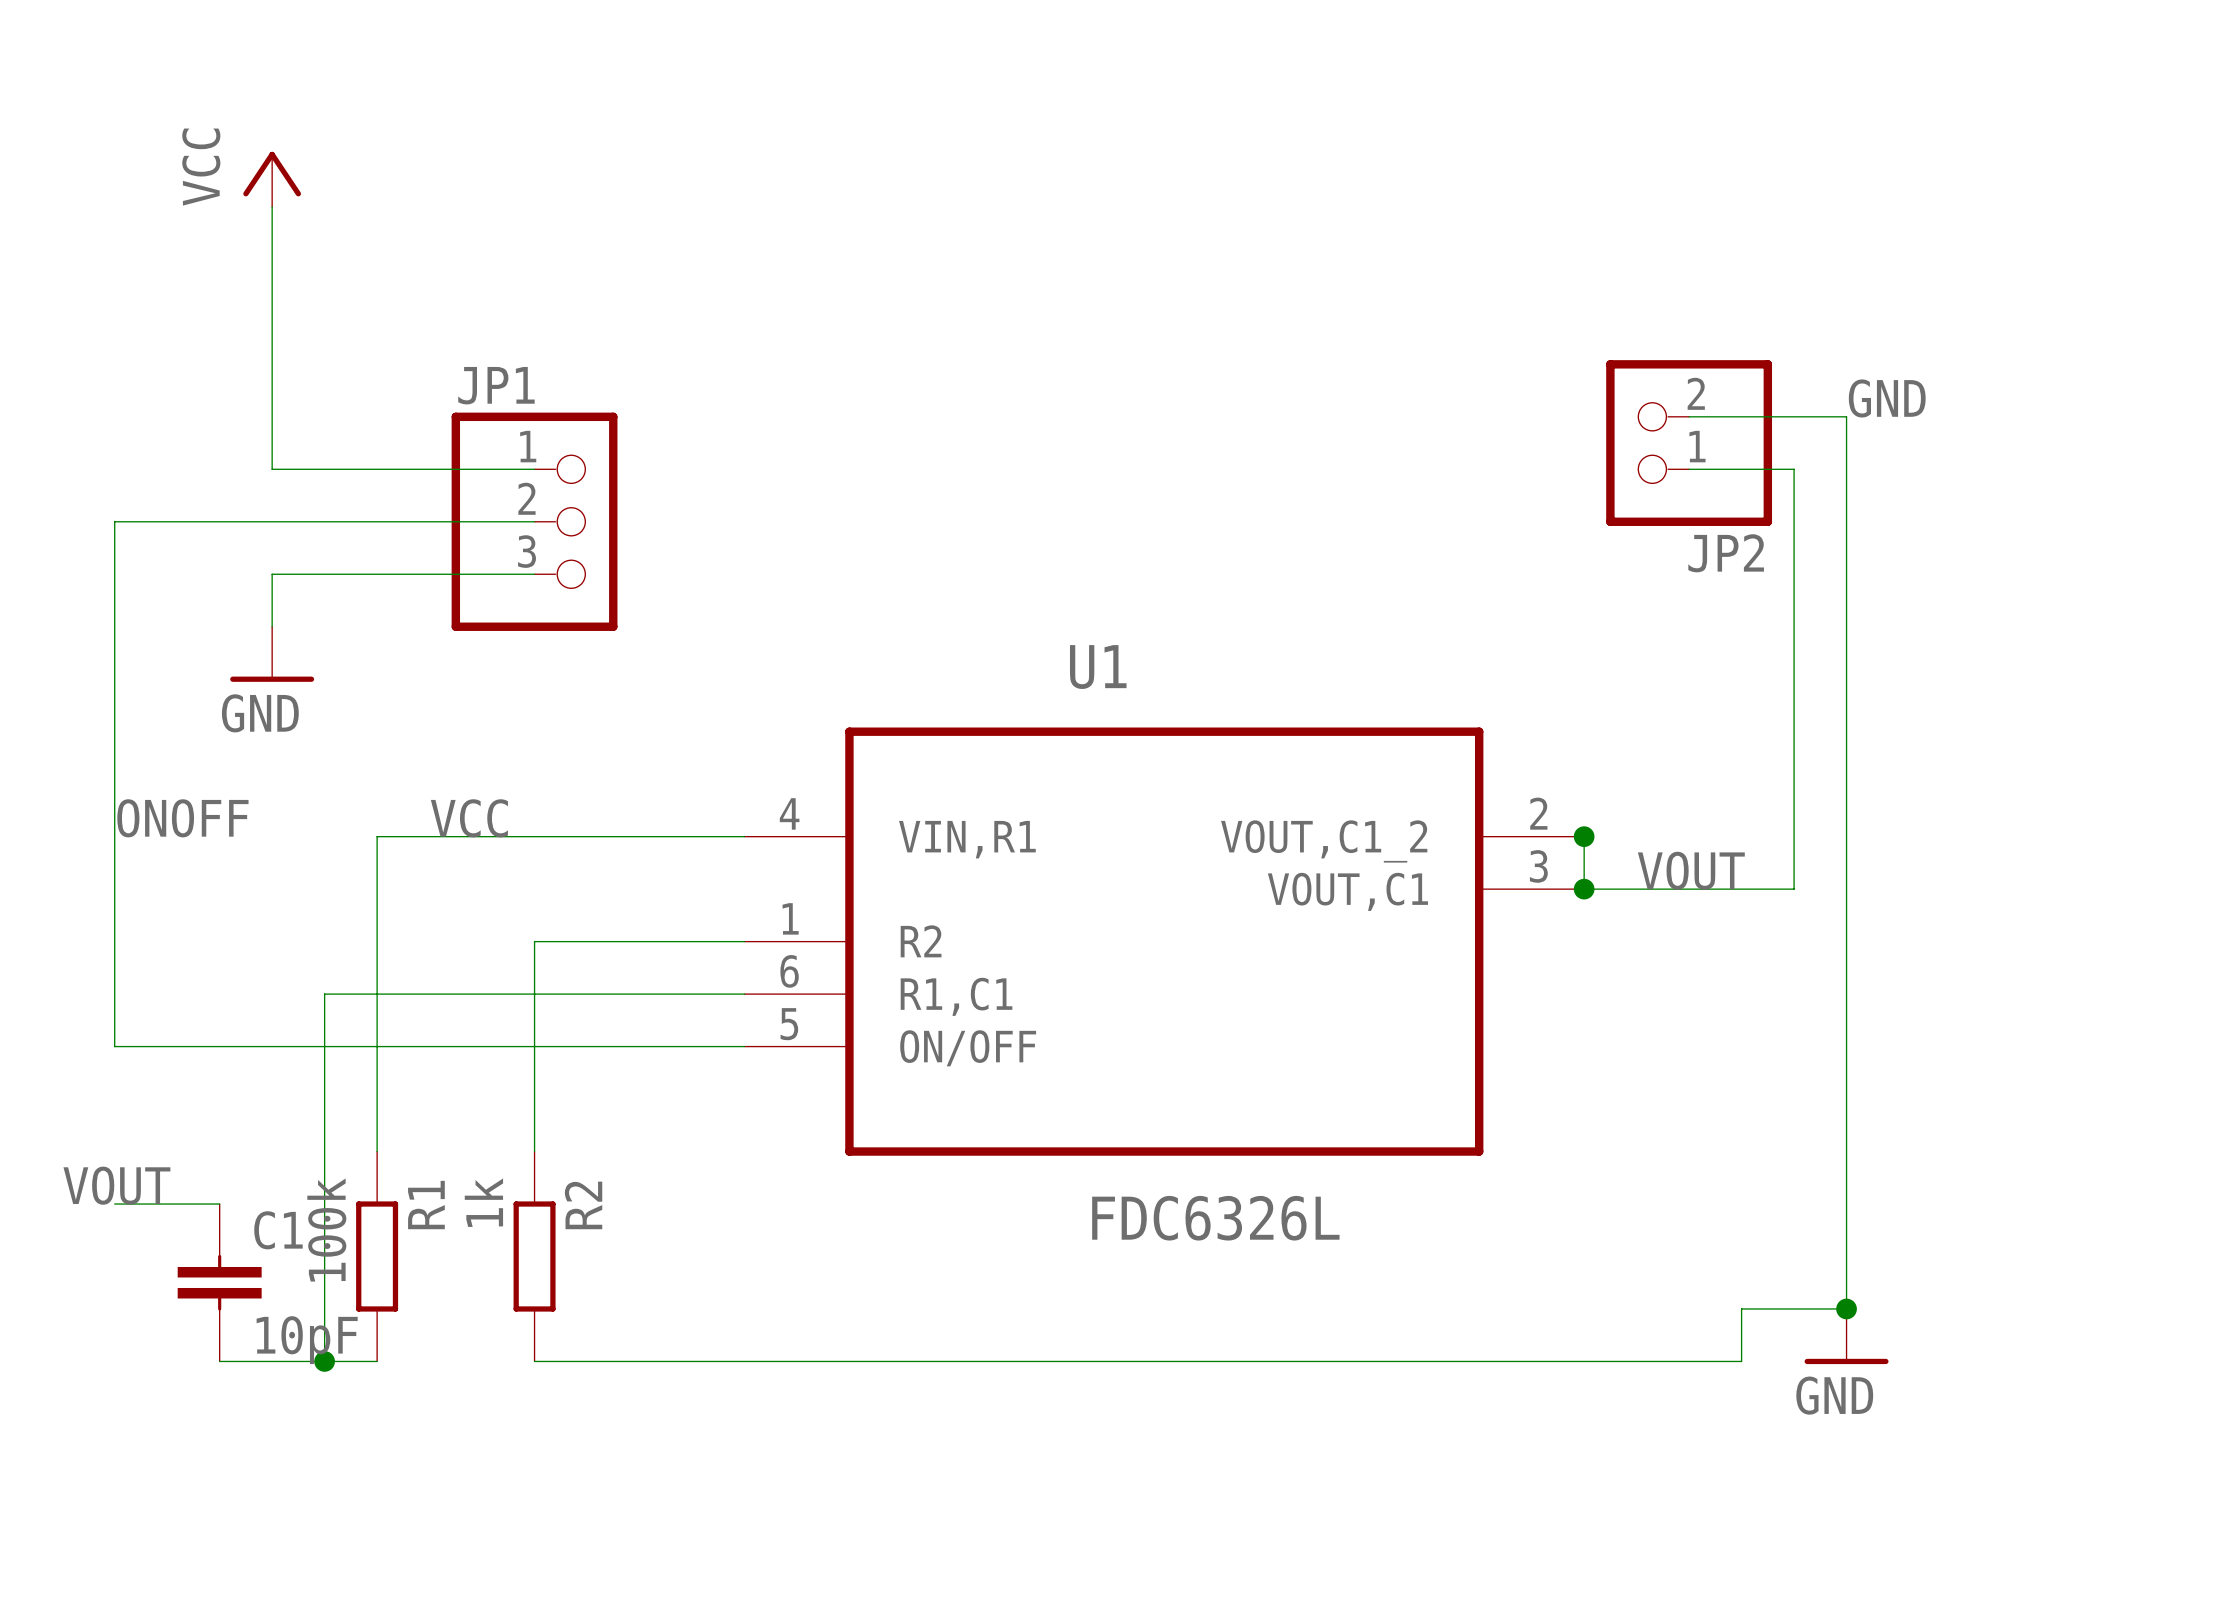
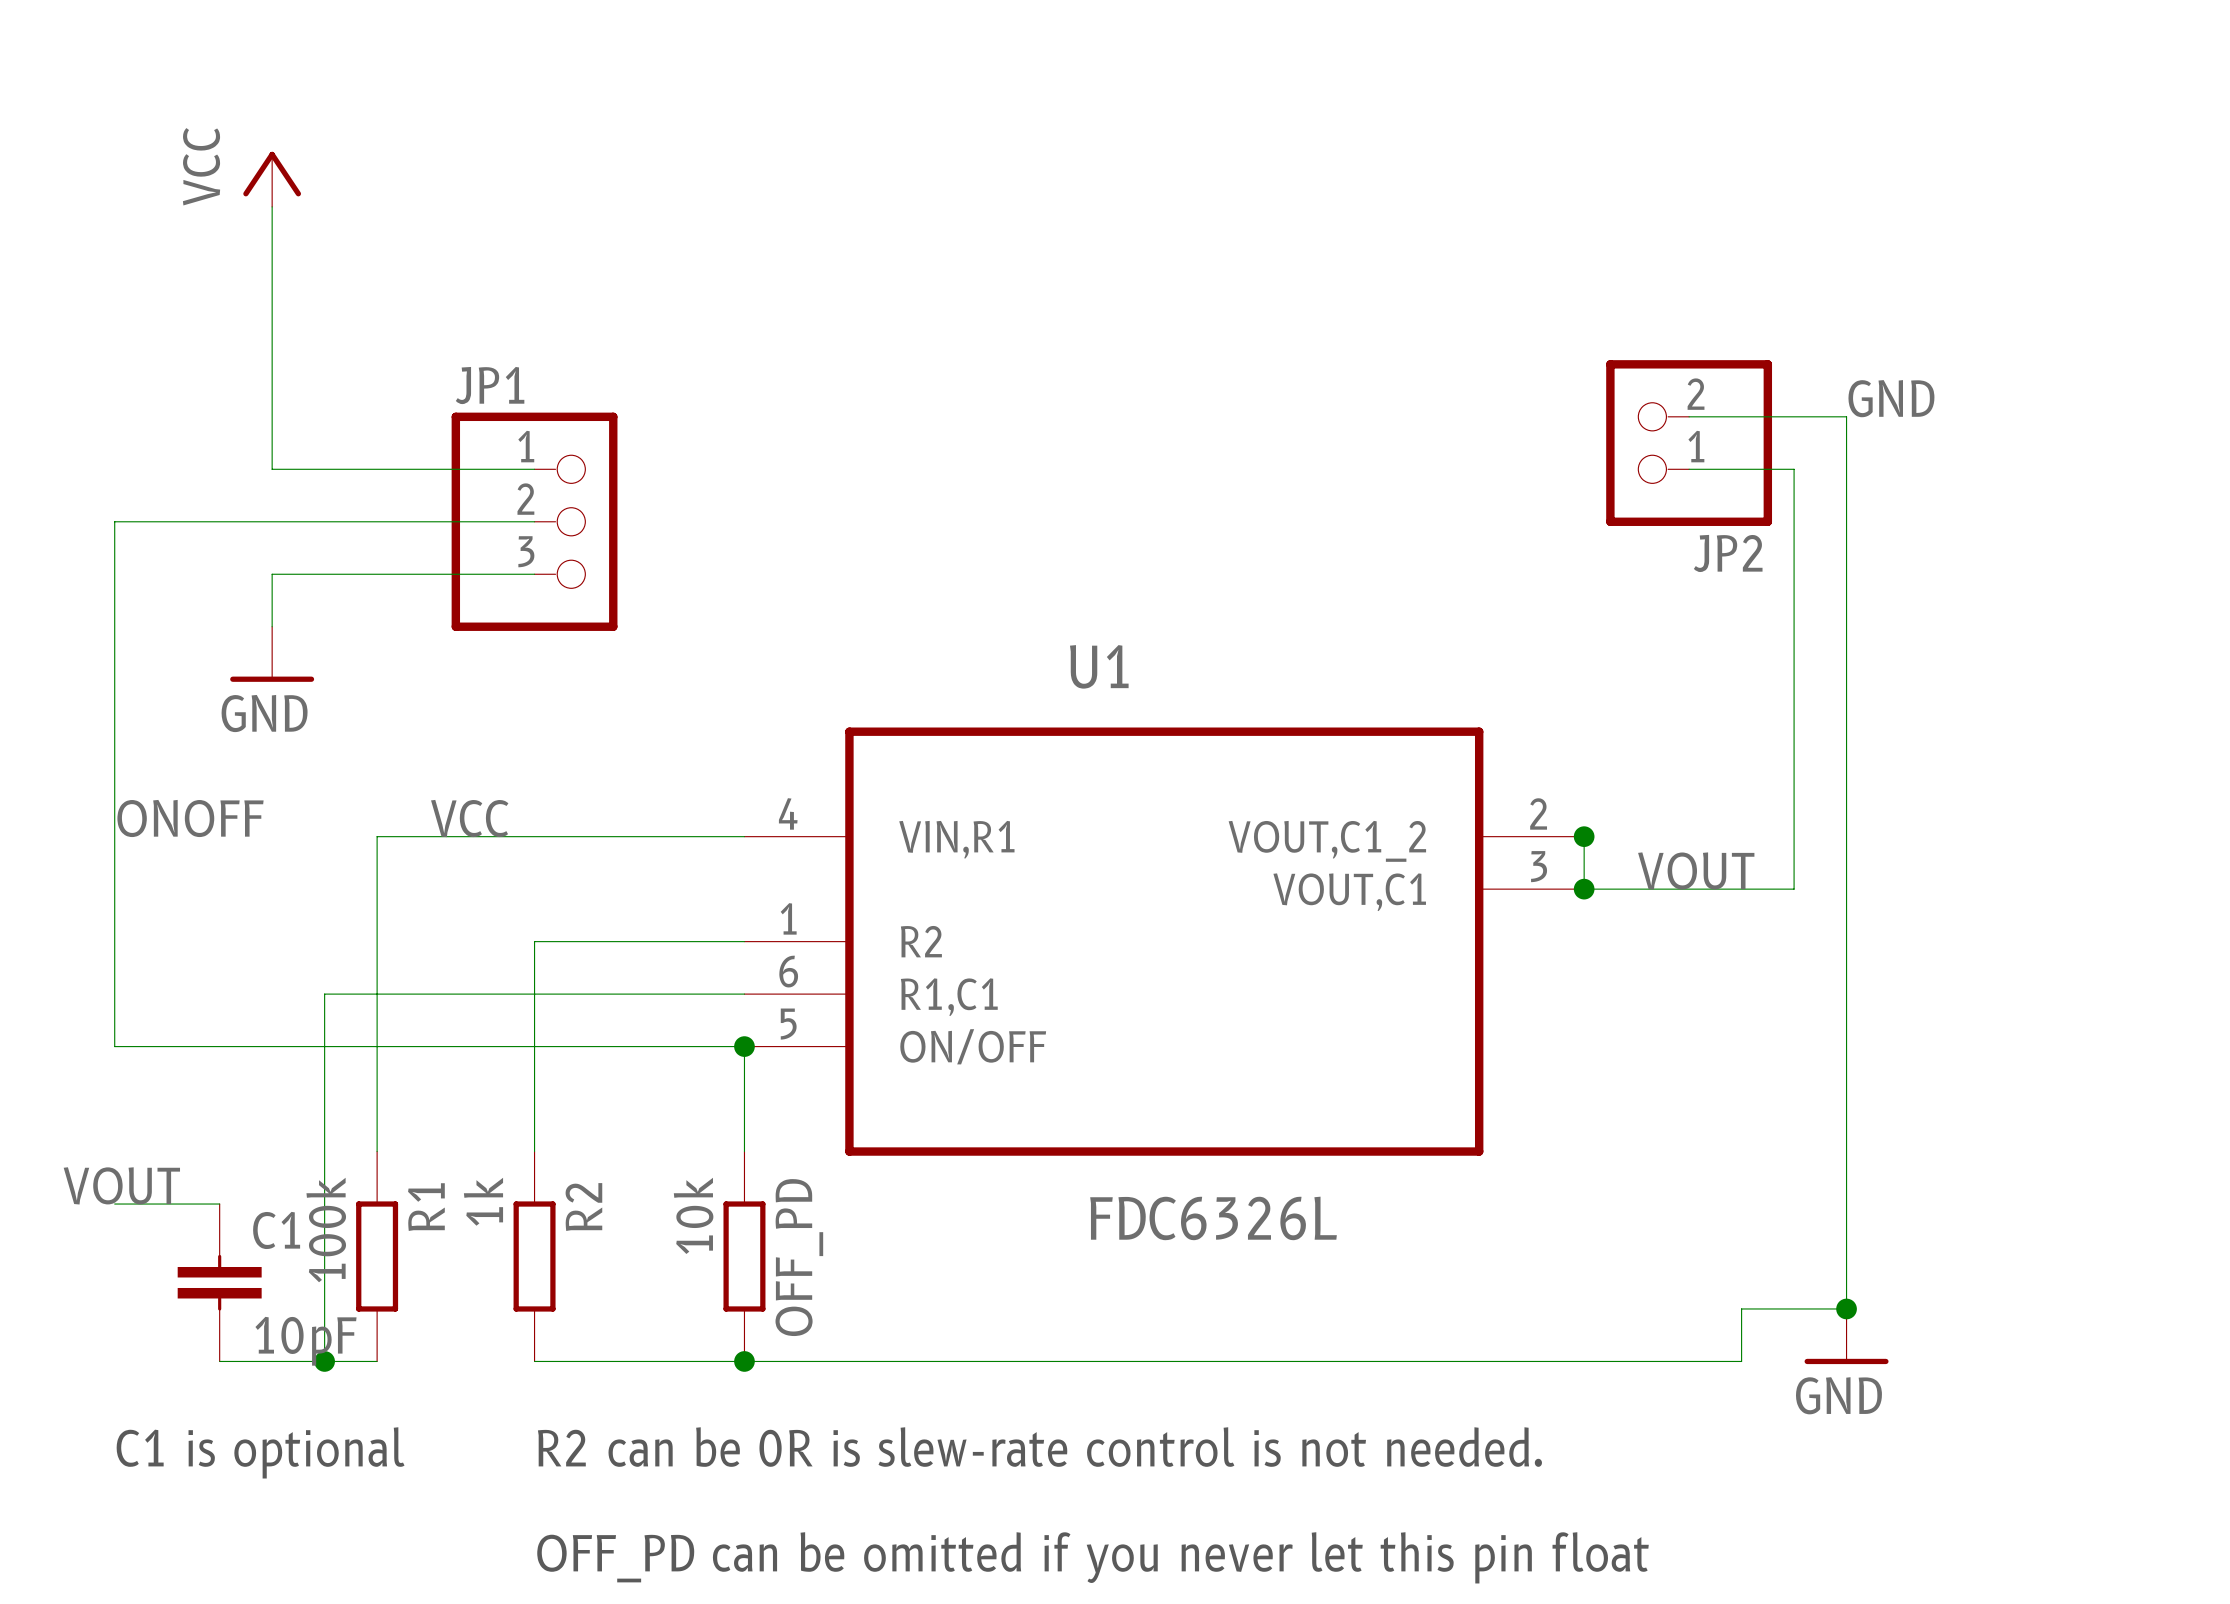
wire: none -> (744, 1046) (744, 1151)
junction: none -> (744, 1046)
OFF_PD: none -> 10k (744, 1256)
junction: none -> (744, 1361)
text: none -> R2 can be 0R is slew-rate control is not needed. (1039, 1447)
text: none -> C1 is optional (260, 1452)
text: none -> OFF_PD can be omitted if you never let this pin float (1093, 1557)

